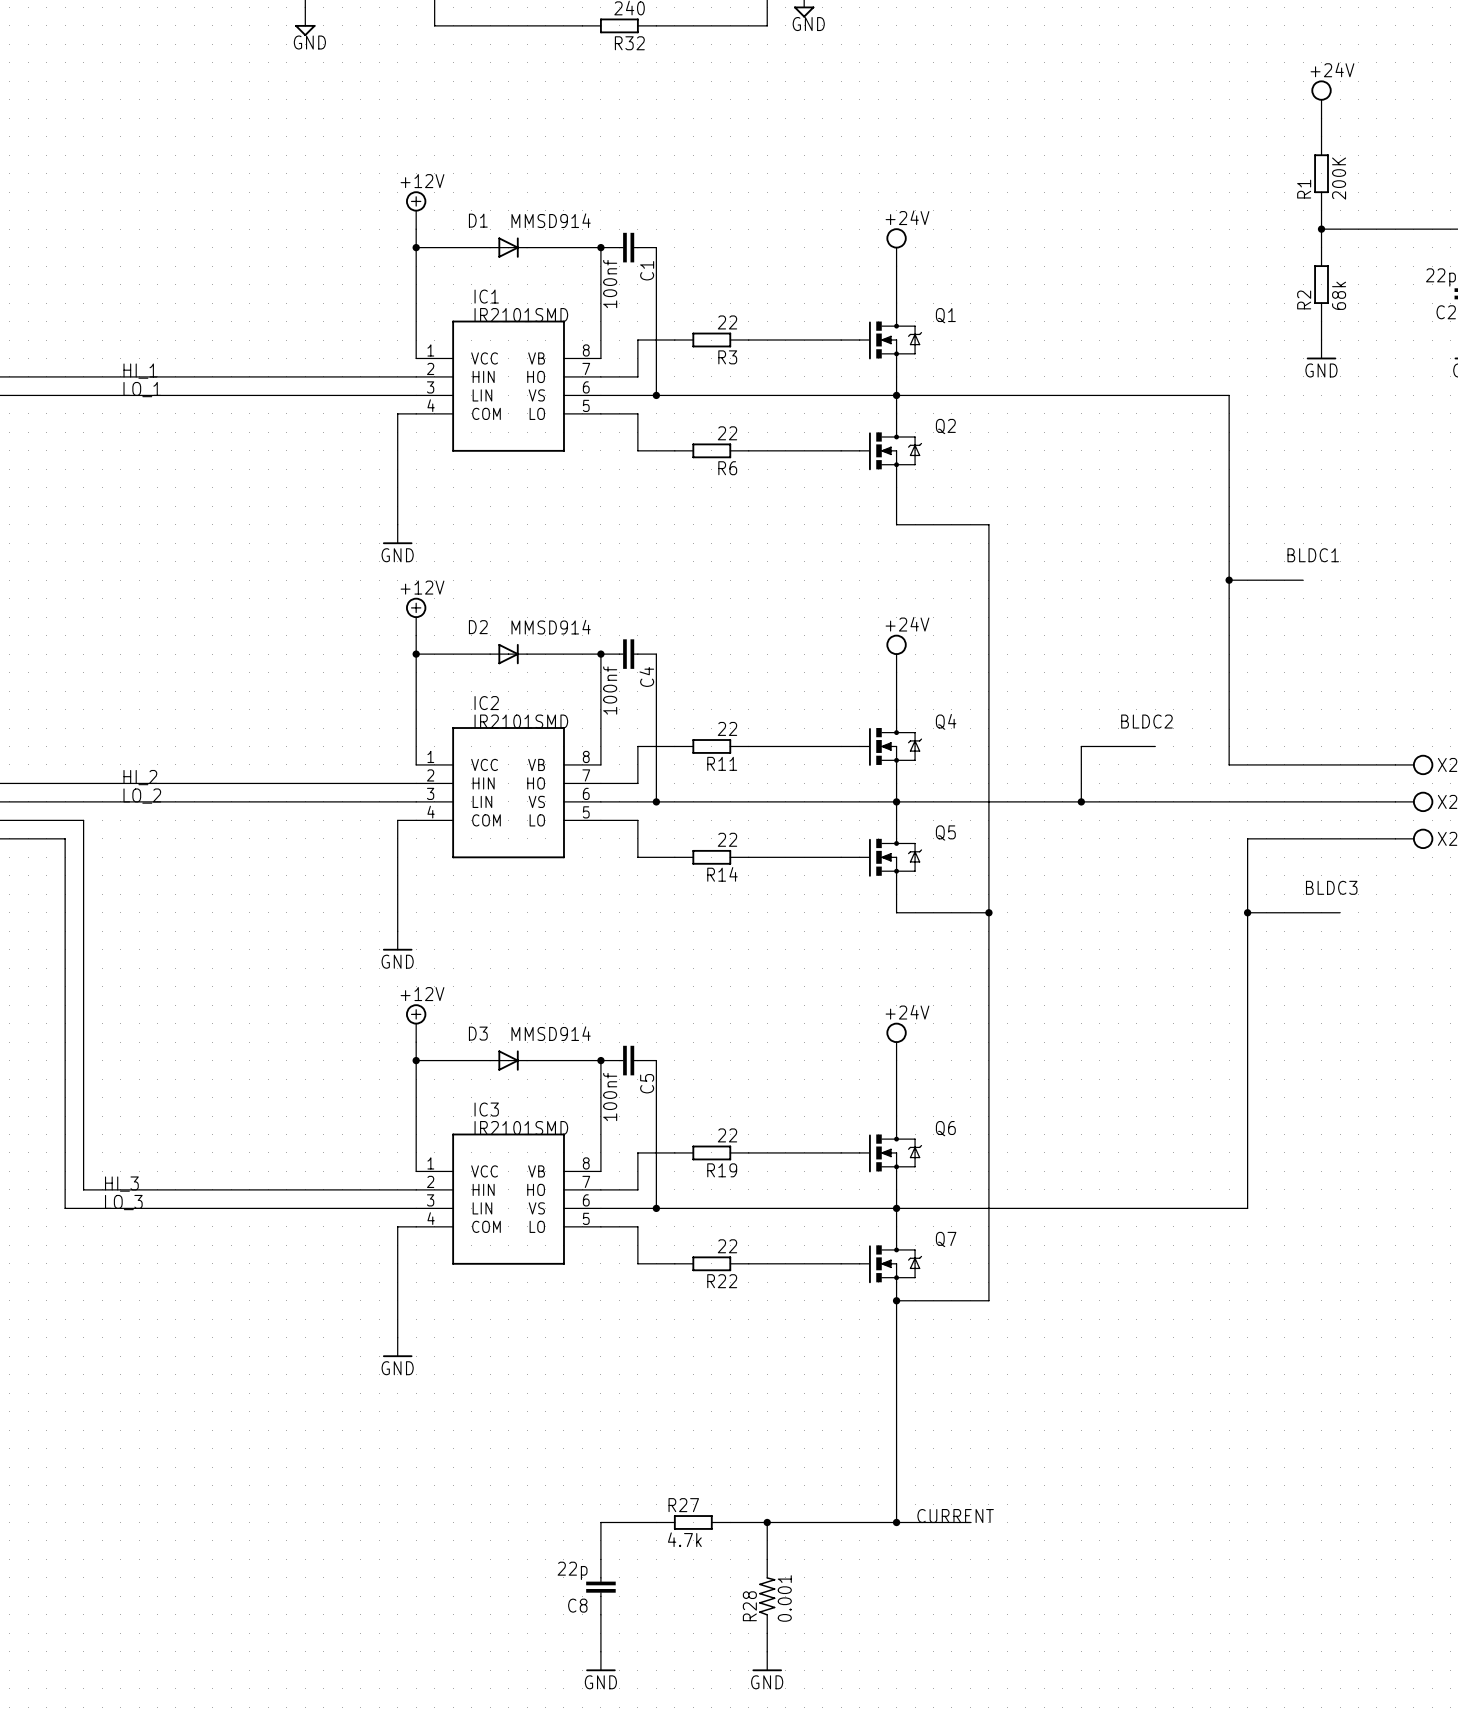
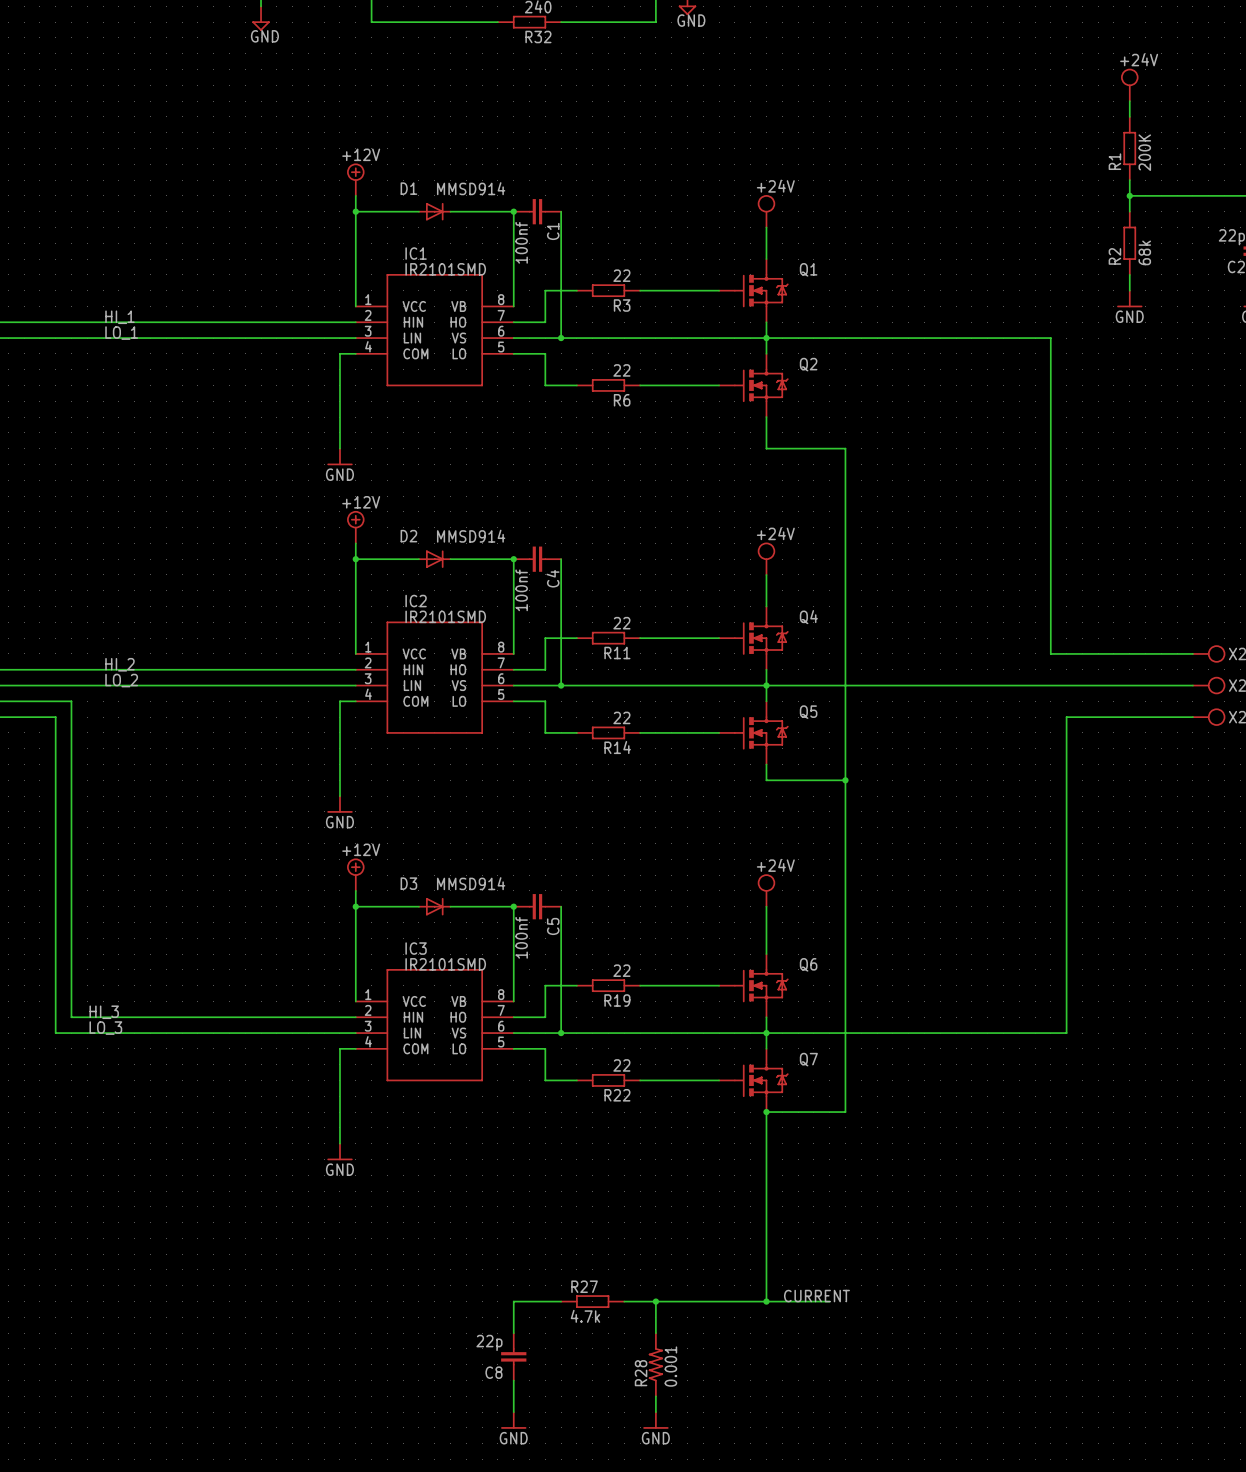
label: BLDC1 (1313, 555) -> none
wire: (1229, 580) (1303, 580) -> none
junction: (1229, 580) -> none
label: BLDC2 (1146, 721) -> none
wire: (1155, 746) (1081, 746) (1081, 801) -> none
junction: (1081, 801) -> none
label: BLDC3 (1331, 887) -> none
wire: (1247, 912) (1340, 912) -> none
junction: (1247, 912) -> none

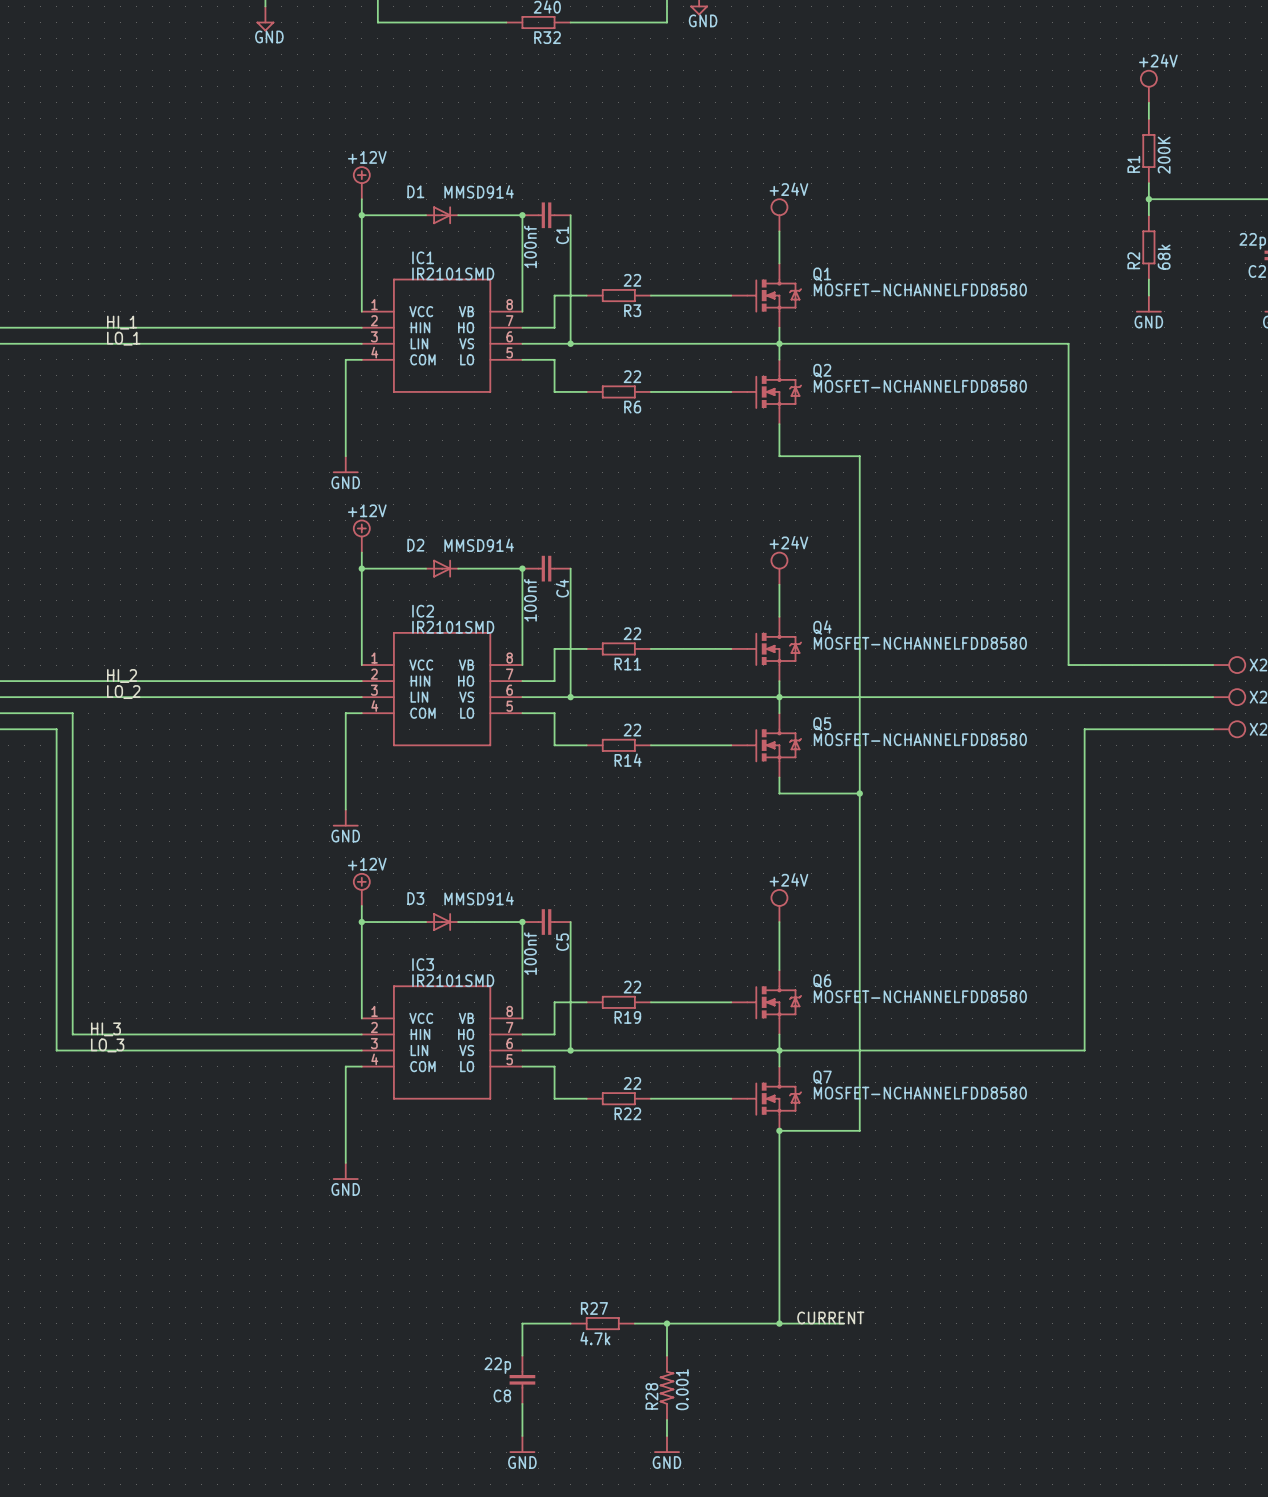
Q1 value: none -> MOSFET-NCHANNELFDD8580 (920, 289)
Q2 value: none -> MOSFET-NCHANNELFDD8580 (920, 386)
Q4 value: none -> MOSFET-NCHANNELFDD8580 (920, 643)
Q5 value: none -> MOSFET-NCHANNELFDD8580 (920, 739)
Q6 value: none -> MOSFET-NCHANNELFDD8580 (920, 996)
Q7 value: none -> MOSFET-NCHANNELFDD8580 (920, 1093)

